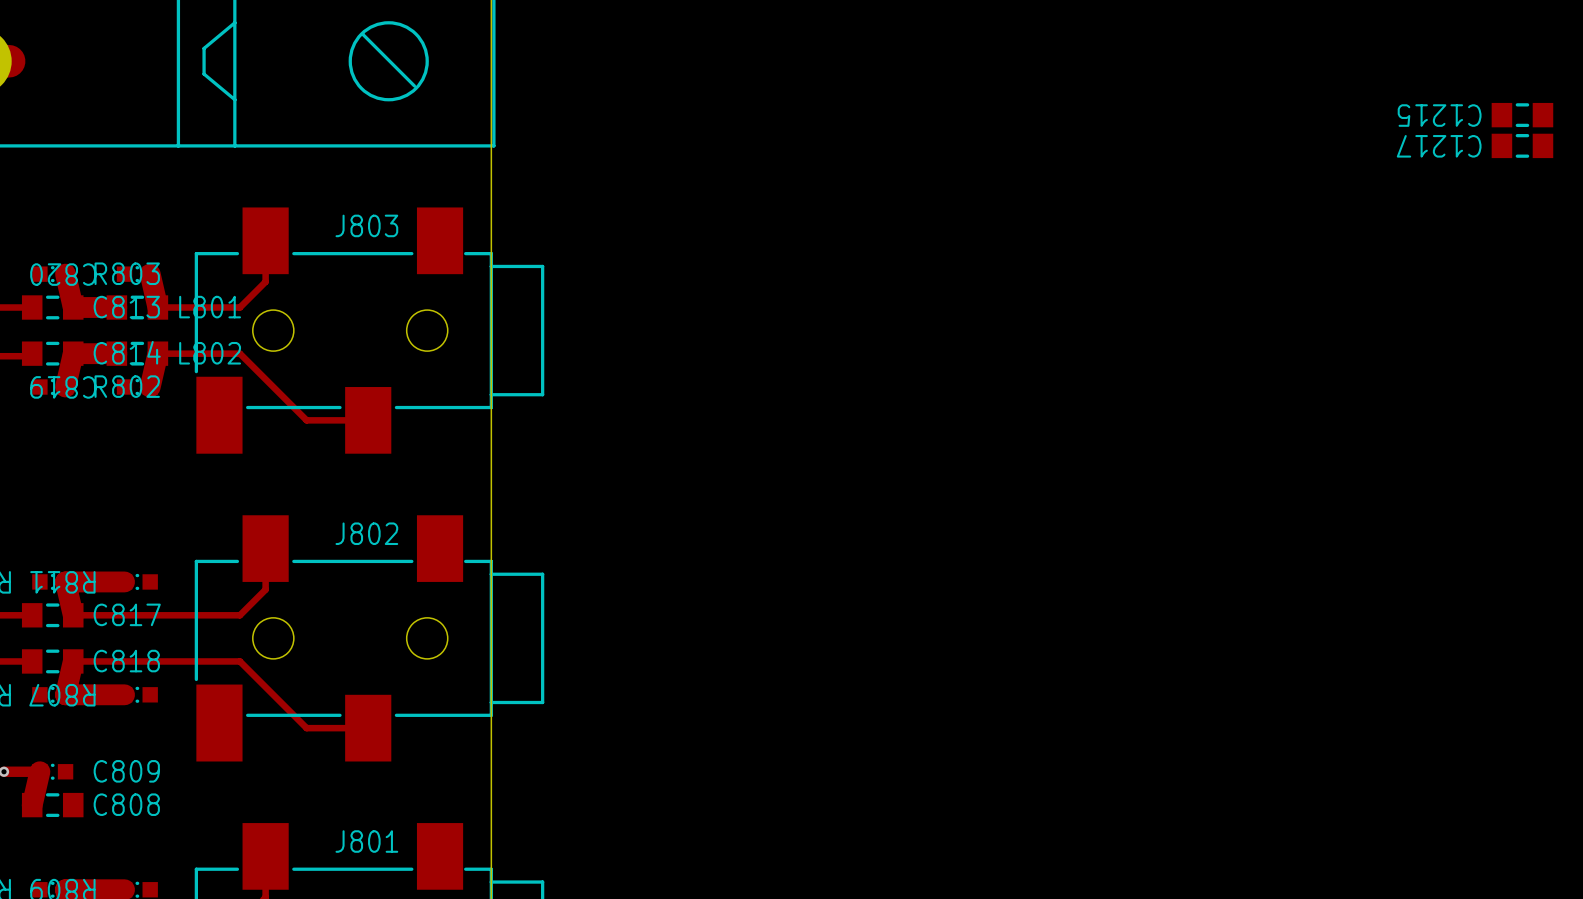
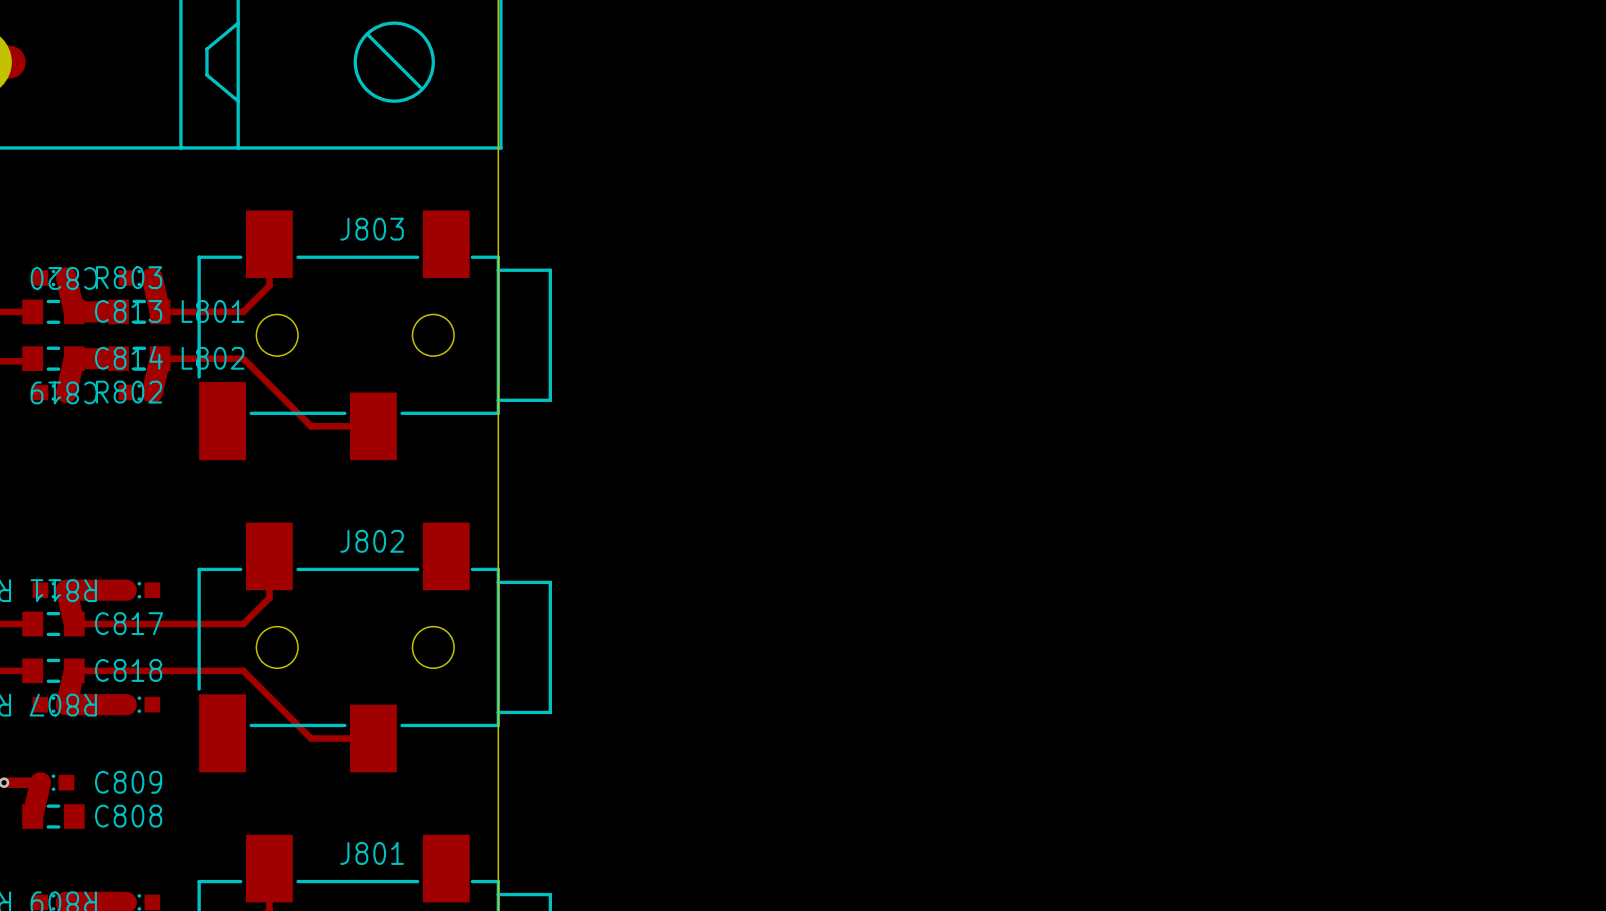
C1215: (1522, 115) -> none
C1217: (1522, 145) -> none

